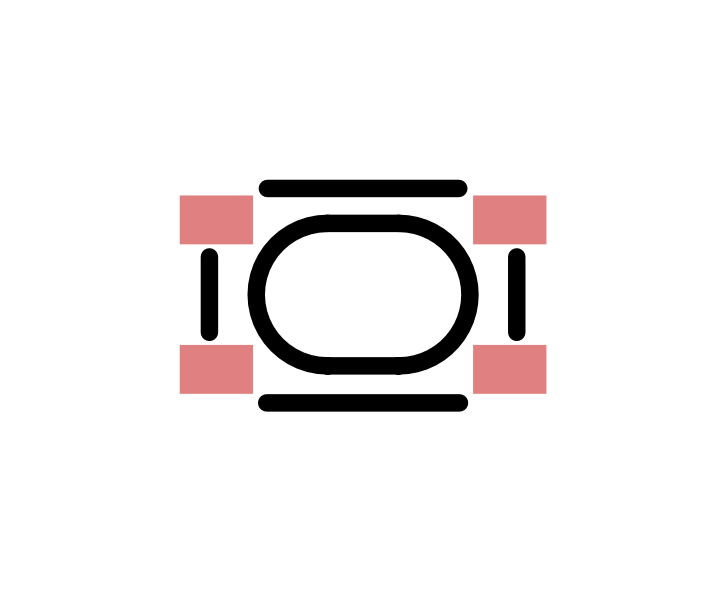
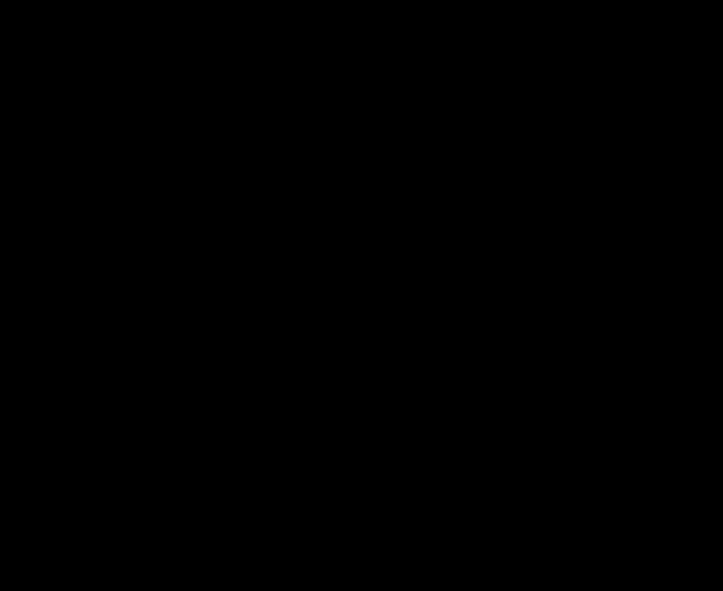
part: (363, 295) -> none

